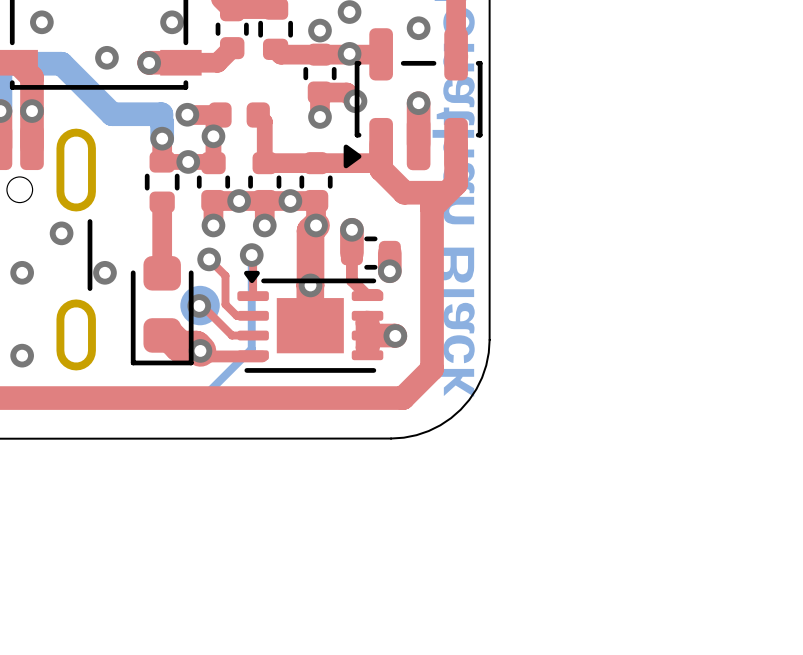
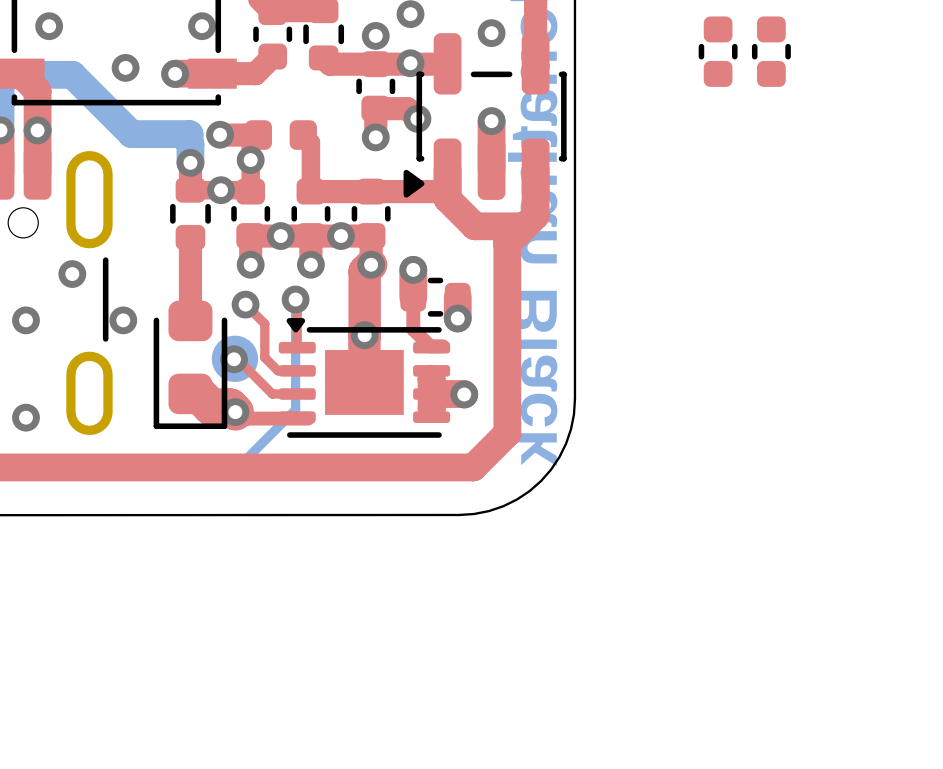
part: none -> (718, 51)
part: none -> (771, 51)

